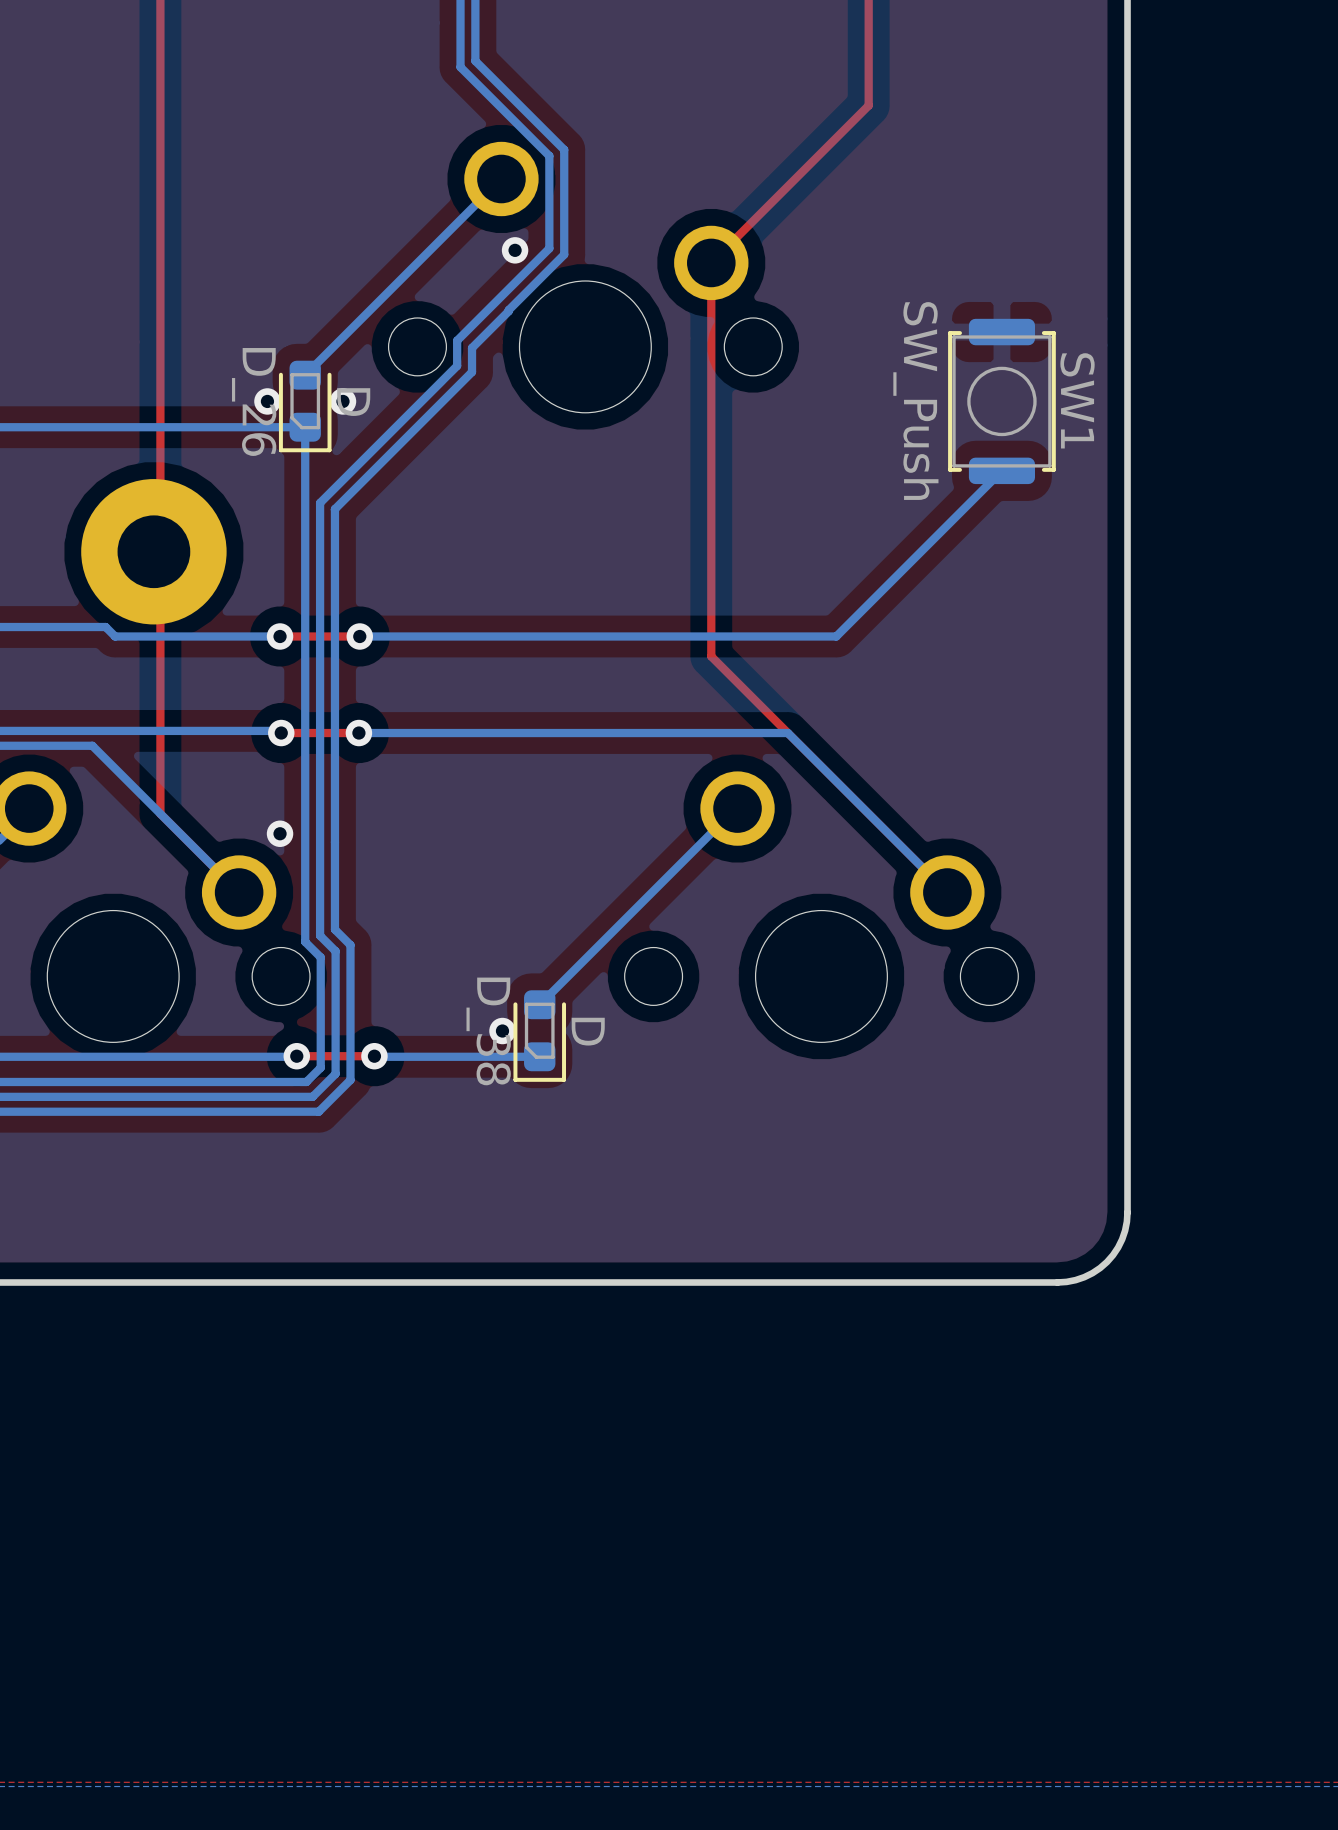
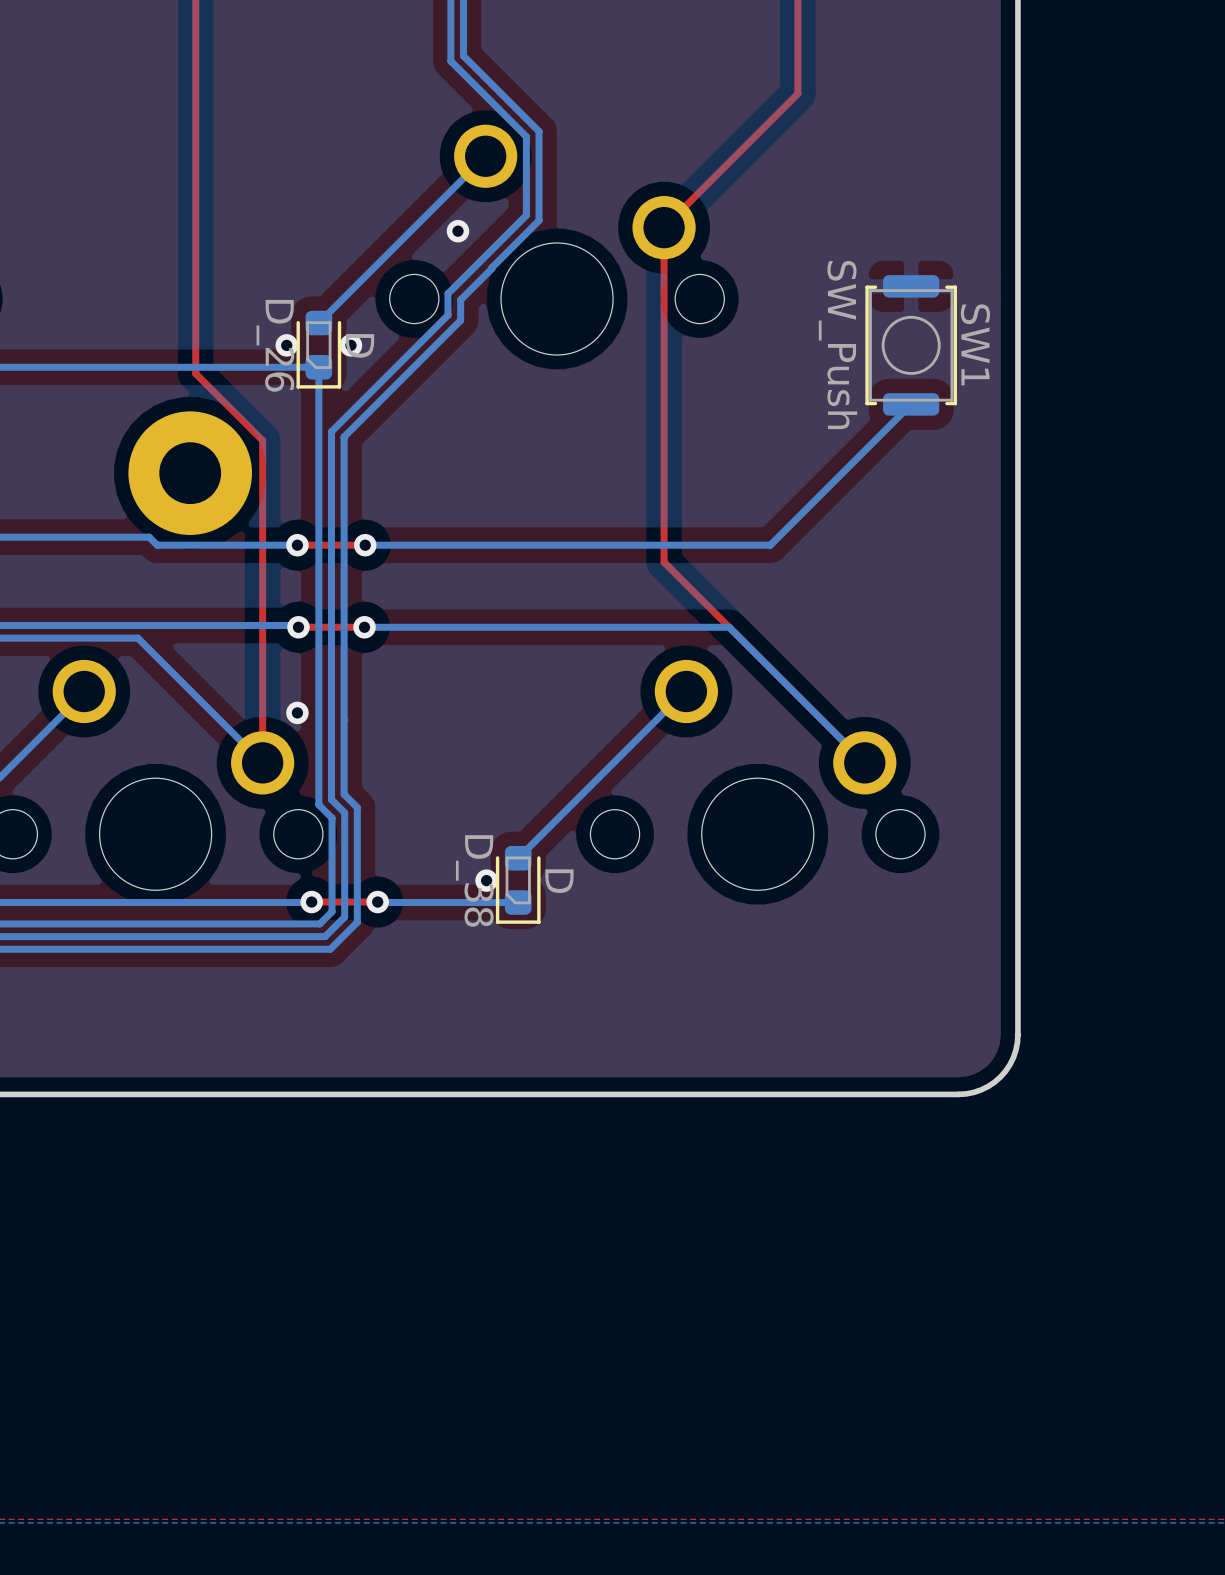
via position: (515, 250) -> (458, 231)
top track: (160, 434) (160, 813) (239, 892) -> (195, 373) (262, 440) (262, 762)

